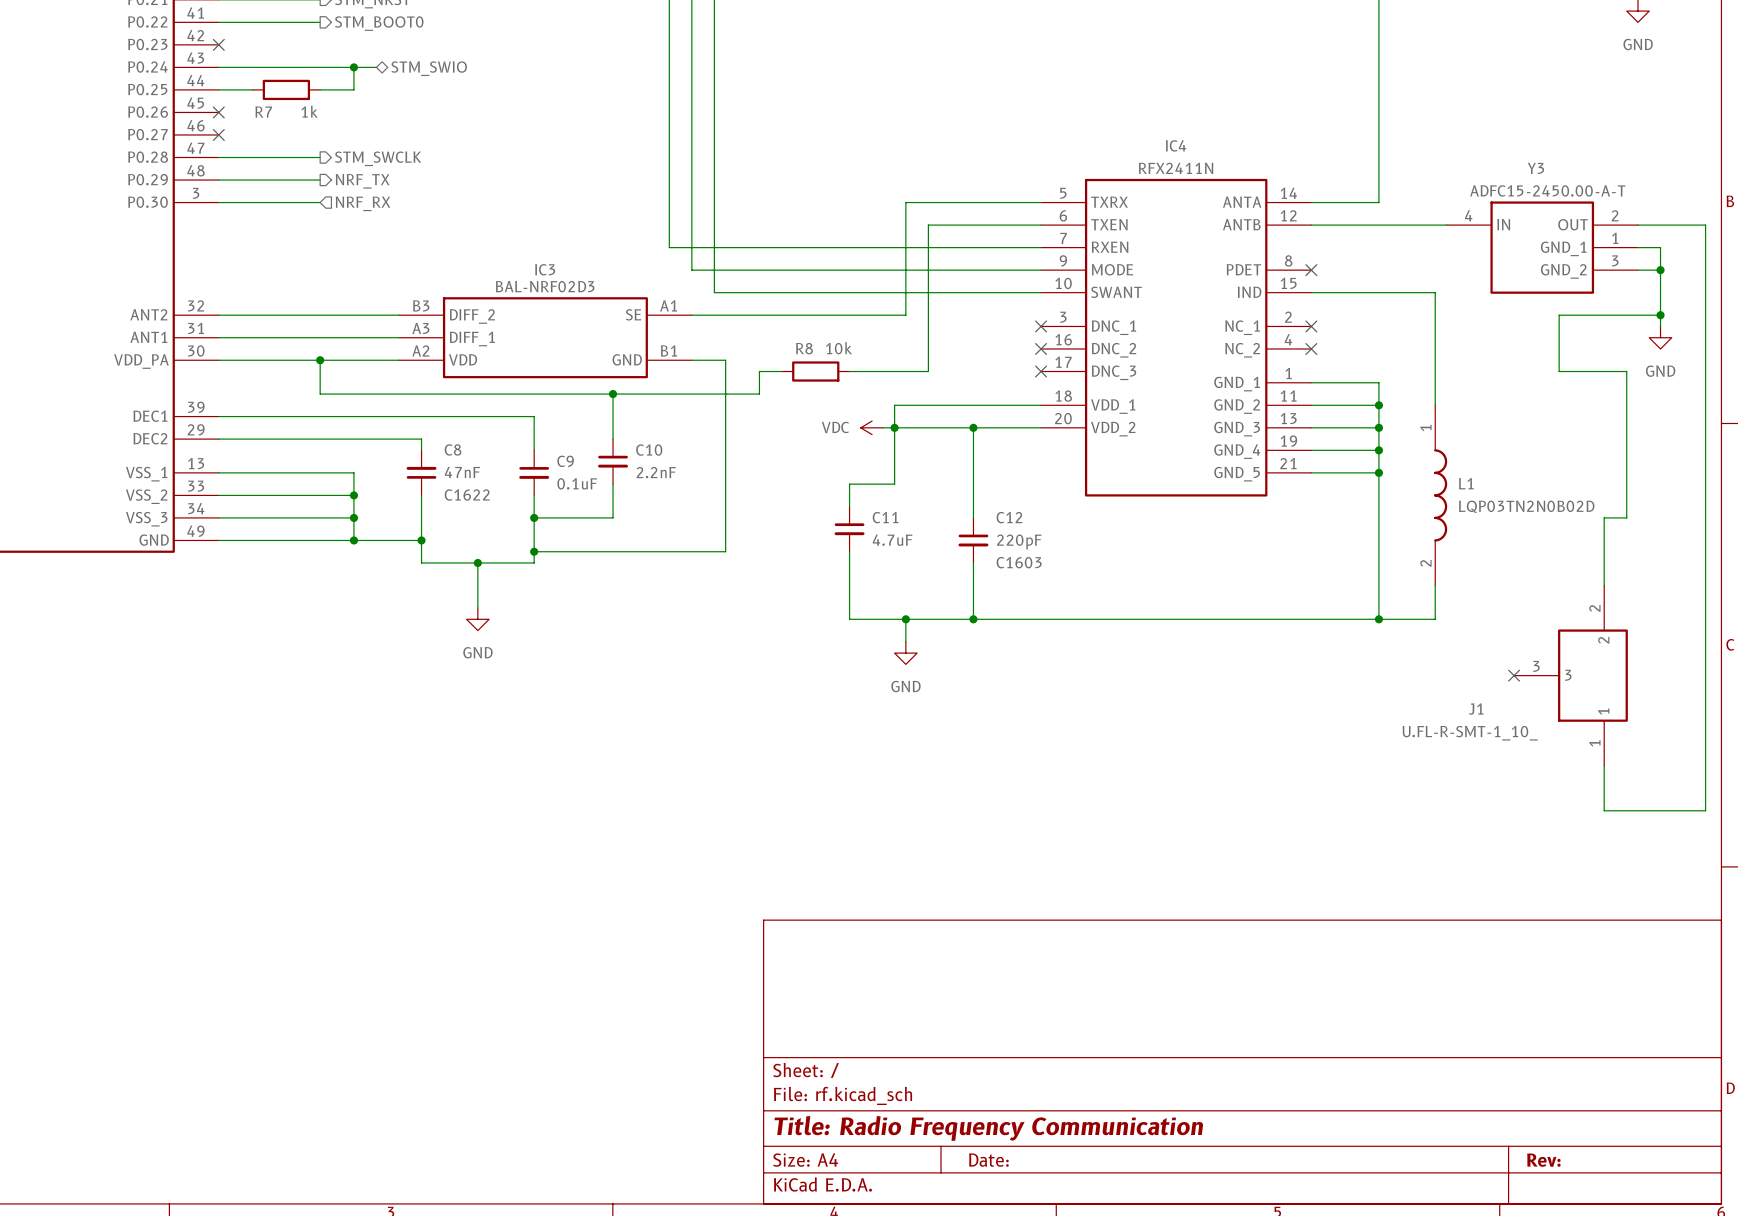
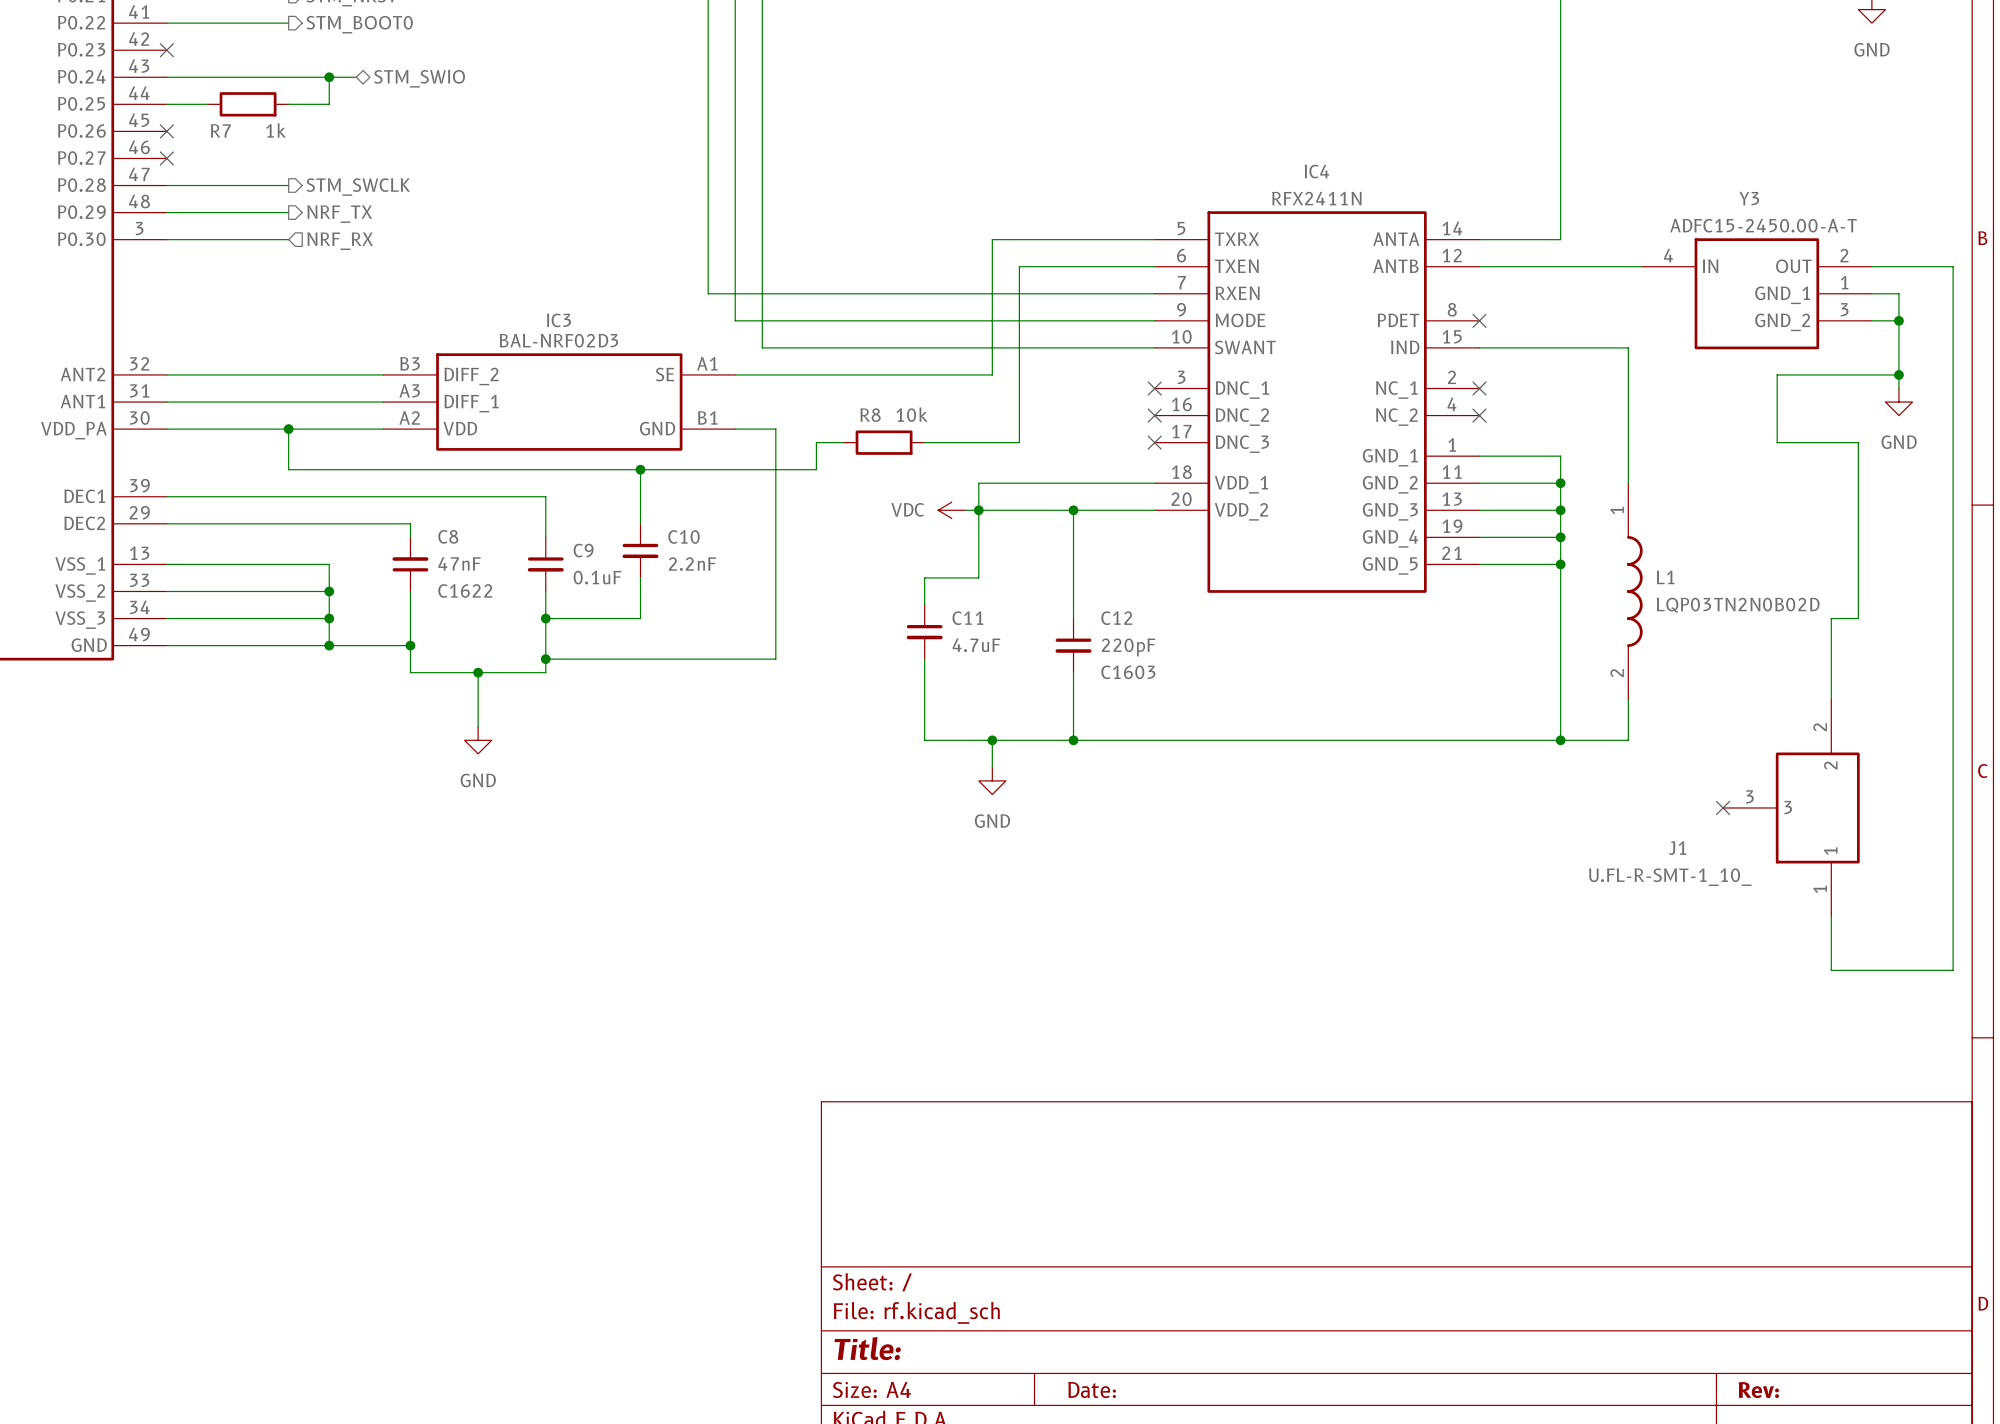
title block: Title: Radio Frequency Communication (988, 1128) -> Title: (867, 1348)

